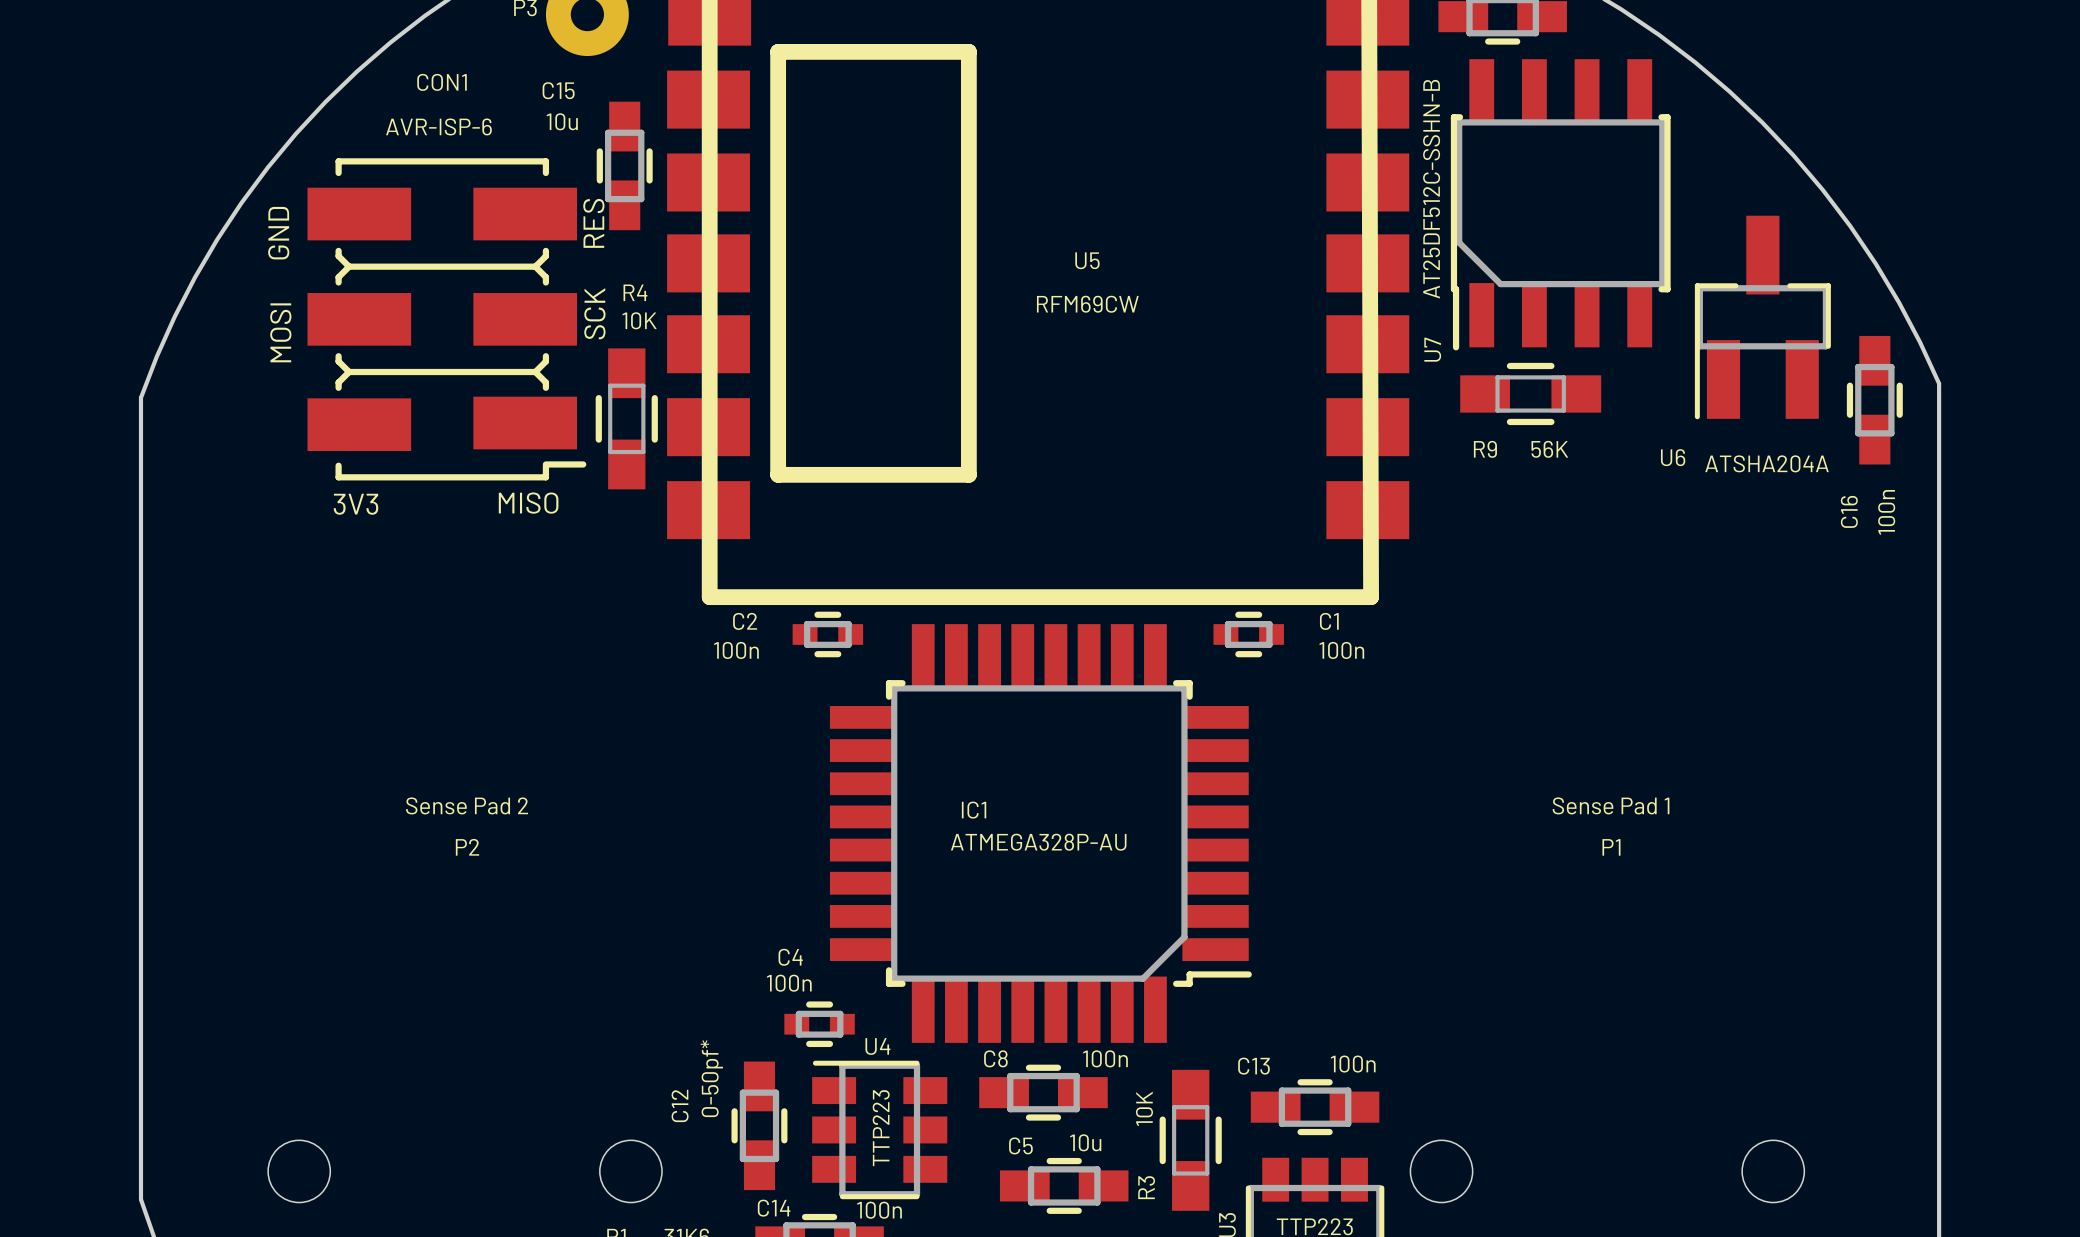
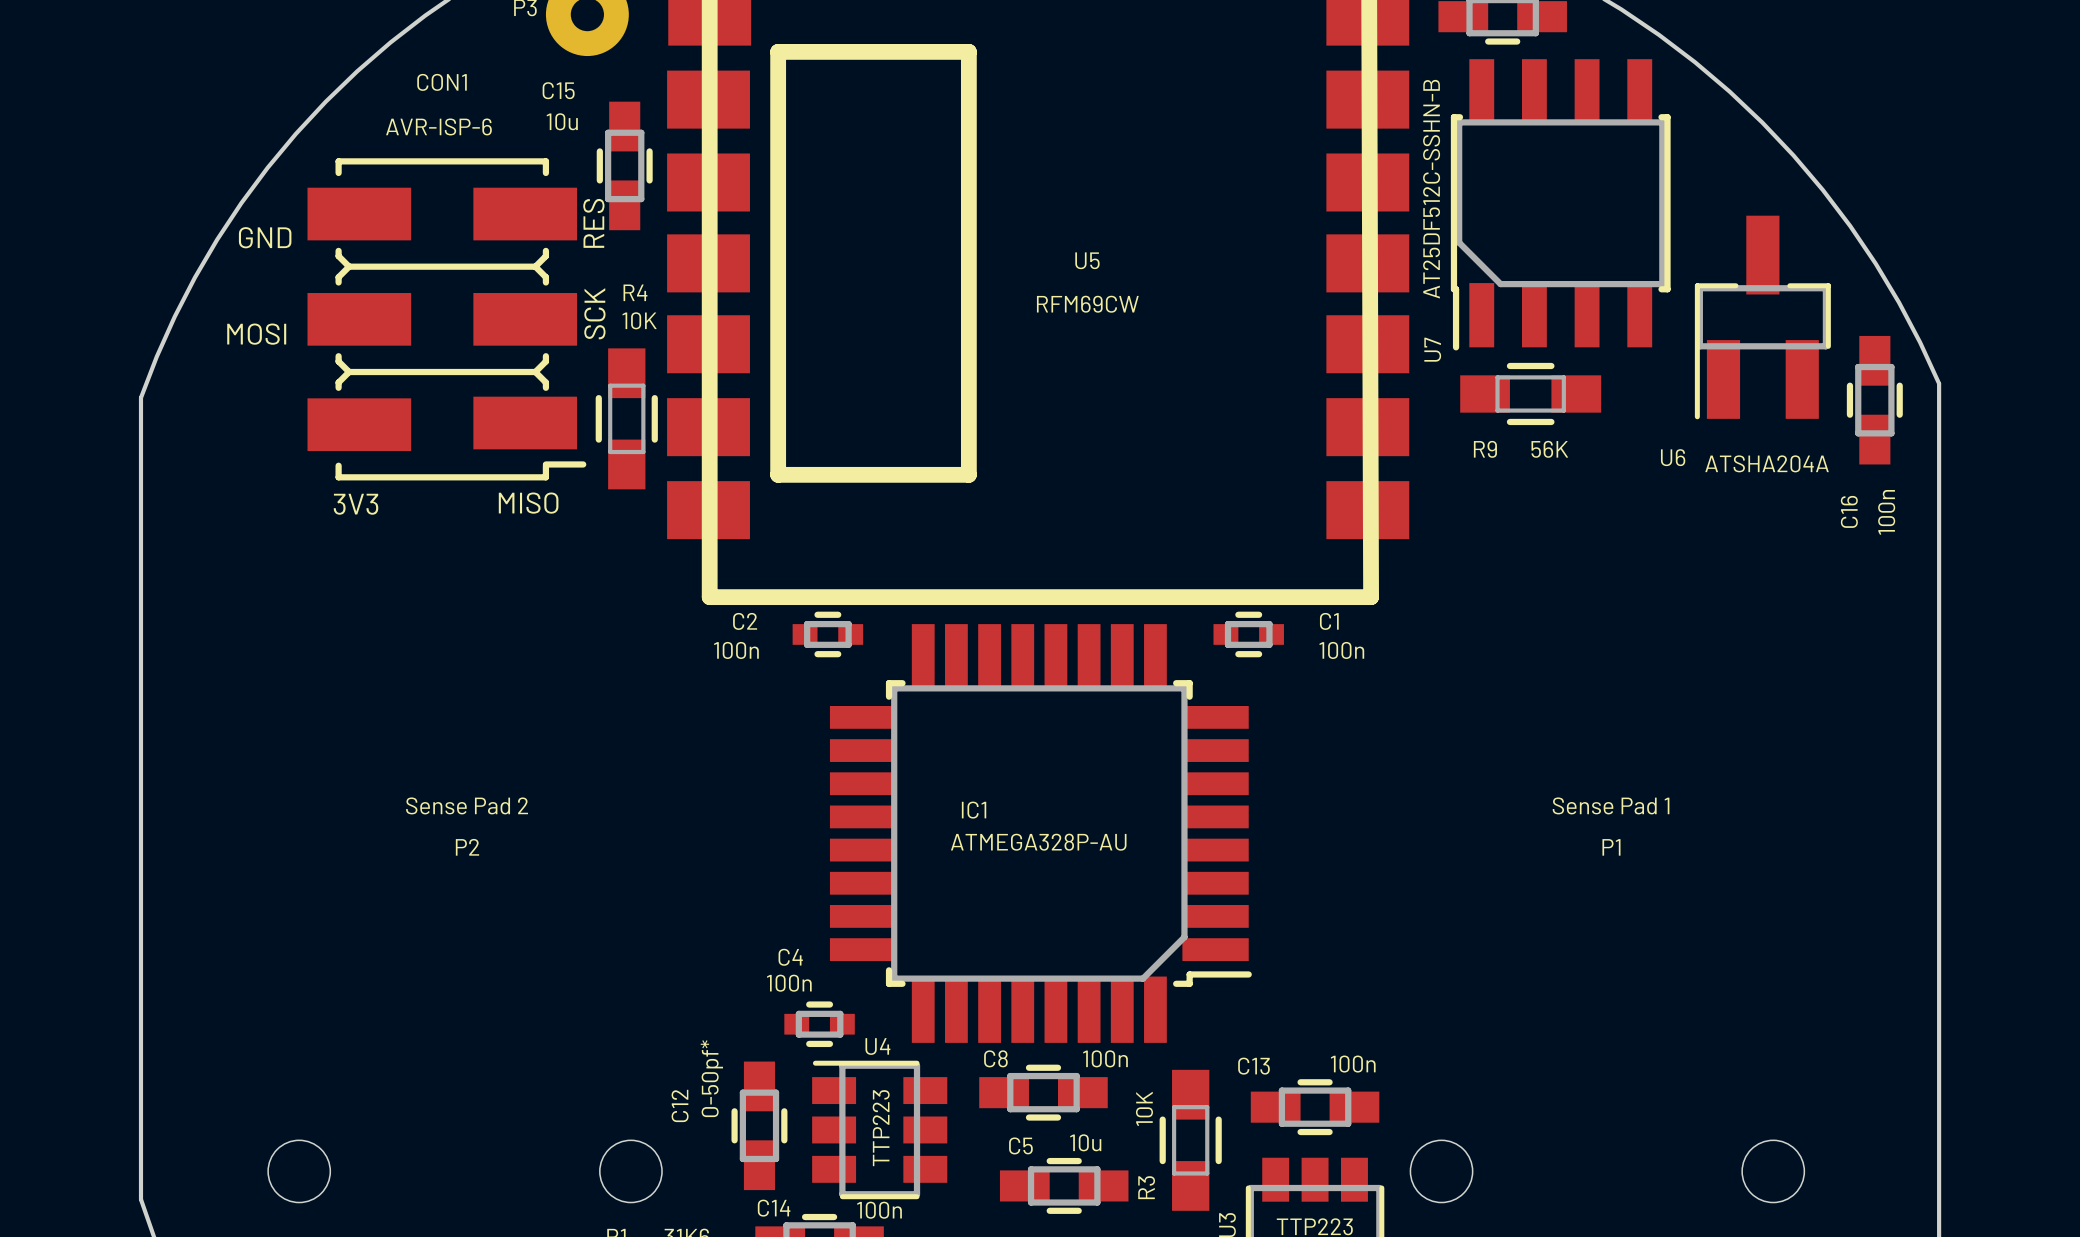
text rotation: 0° (278, 233) -> 90° clockwise (265, 237)
text rotation: 0° (280, 332) -> 90° clockwise (256, 334)

